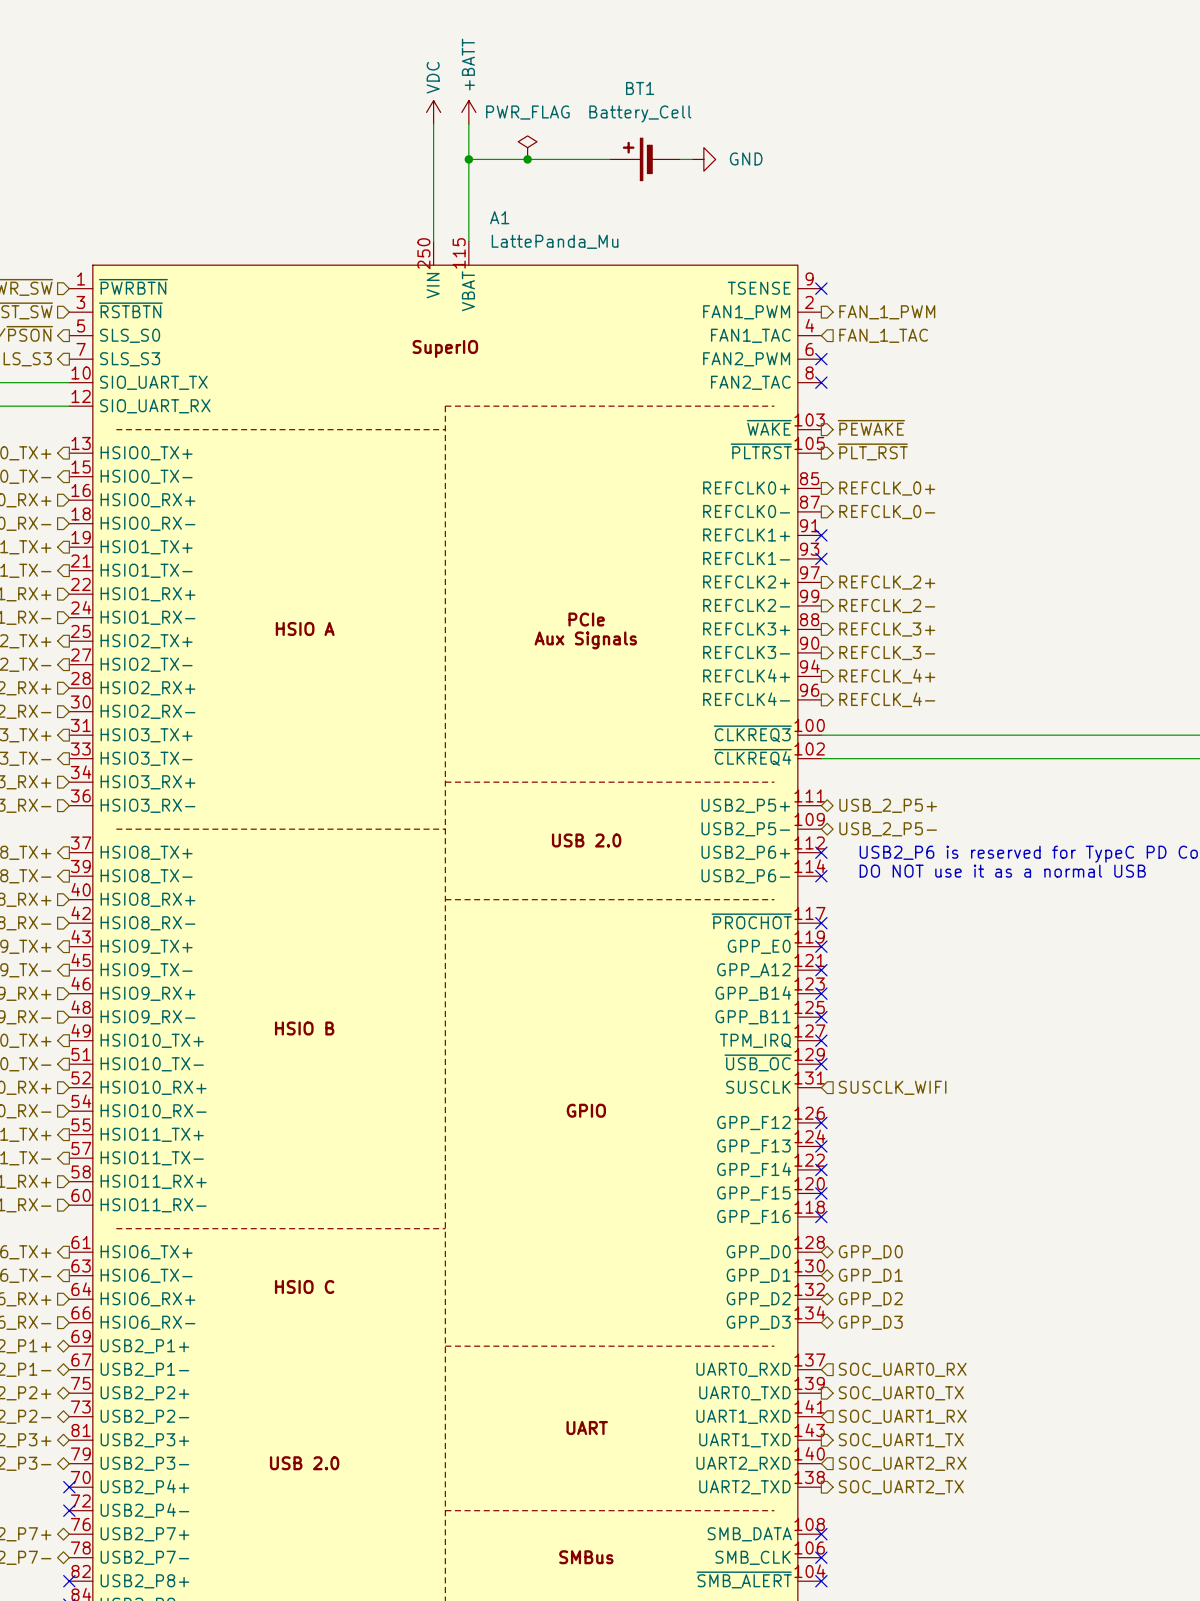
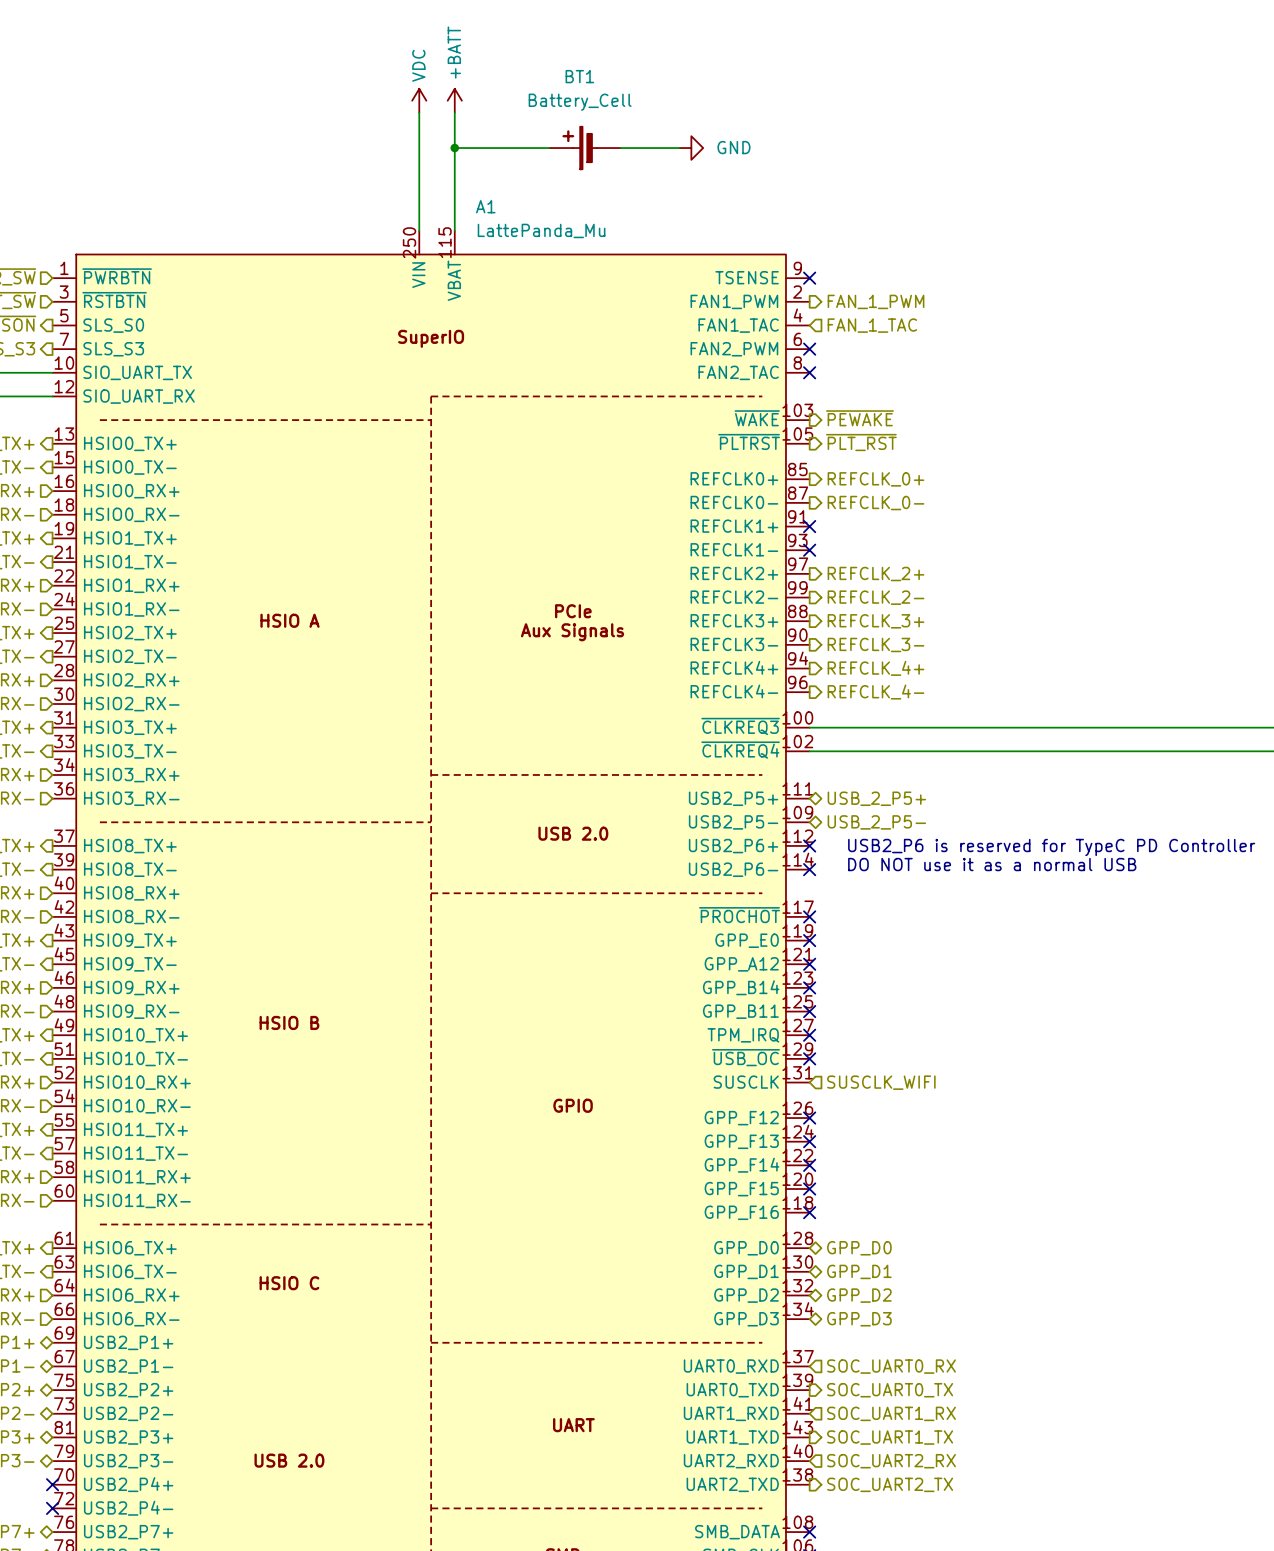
power symbol: PWR_FLAG (527, 147) -> none
junction: (527, 159) -> none
BT1 position: (645, 159) -> (584, 148)

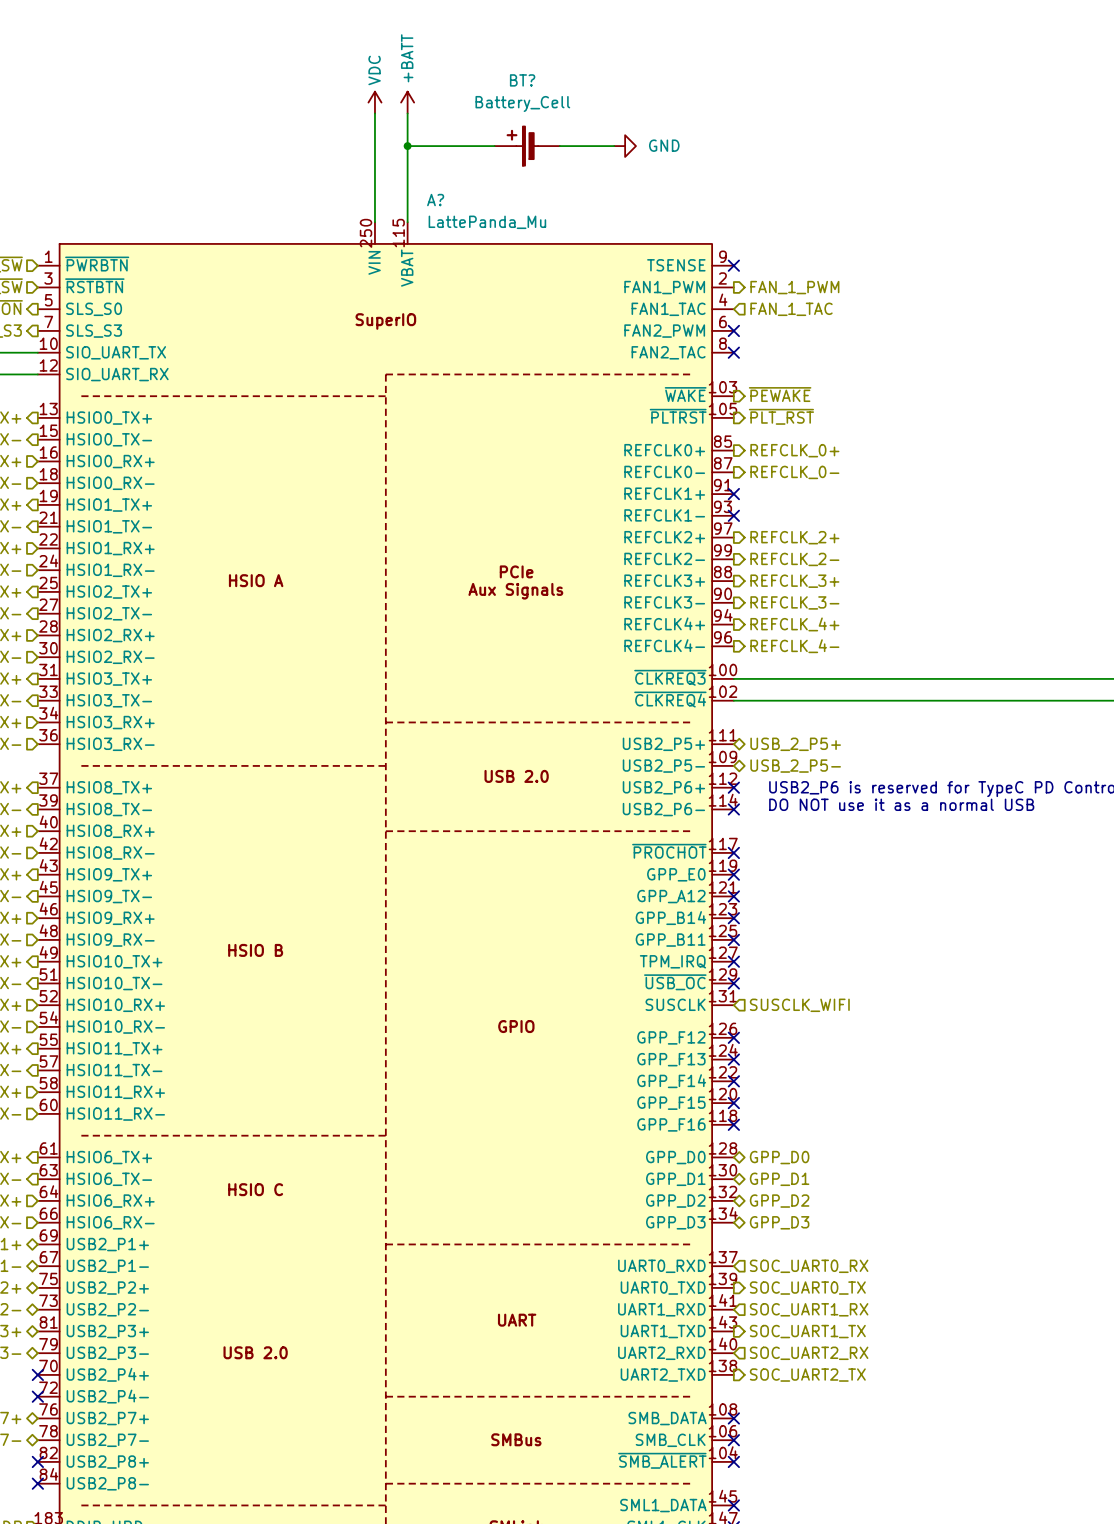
BT1 name: BT1 (579, 76) -> BT? (522, 80)
A1 name: A1 (485, 206) -> A? (435, 200)

